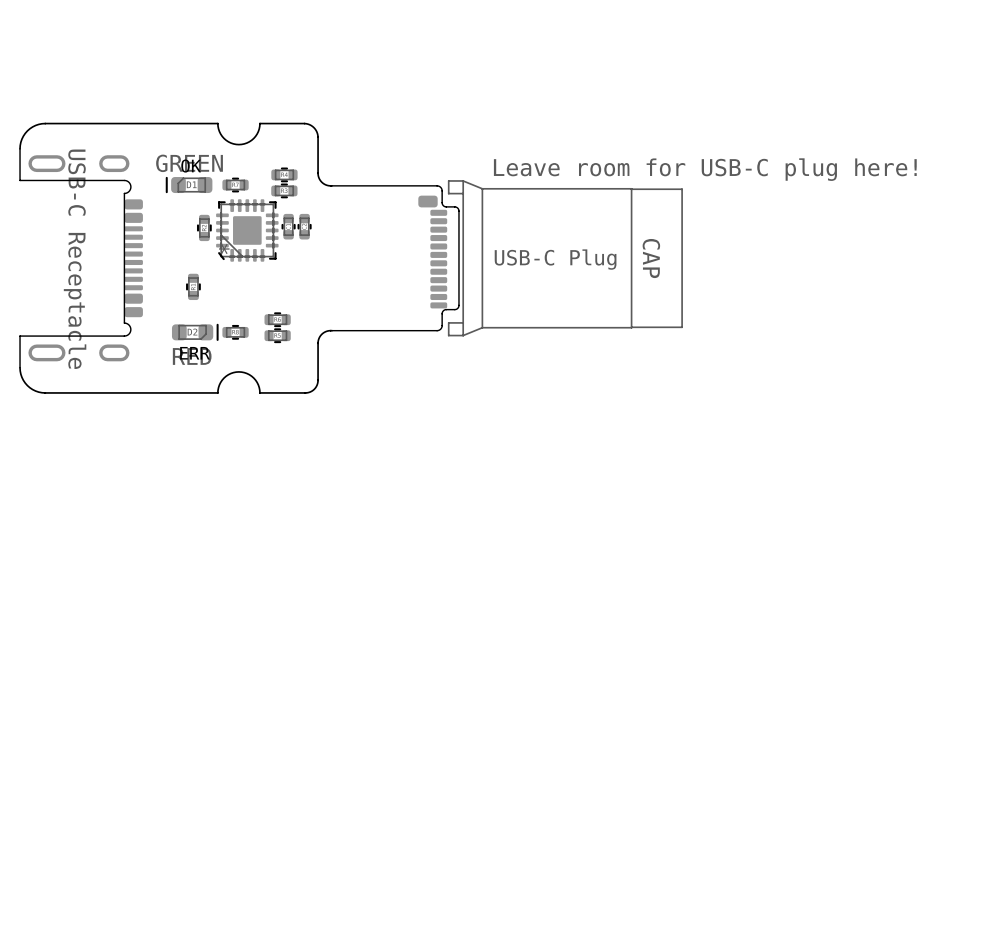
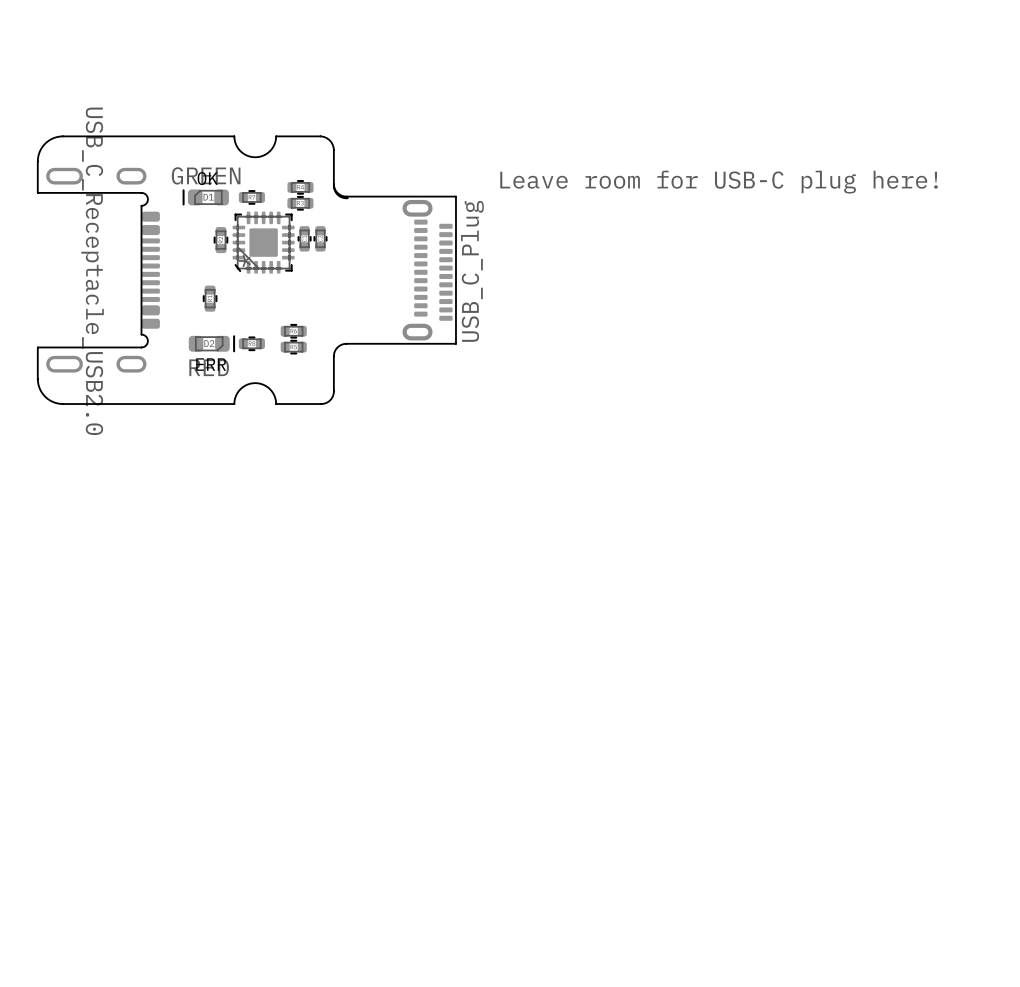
part: none -> USB_C_Plug (427, 270)
part: (507, 258) -> none
part value: USB-C Receptacle (75, 259) -> USB_C_Receptacle_USB2.0 (92, 271)
board edge: (332, 330) (321, 334) (318, 344) -> (333, 184) (336, 192) (345, 196) (455, 196) (455, 343) (344, 343) (337, 347) (333, 356)

